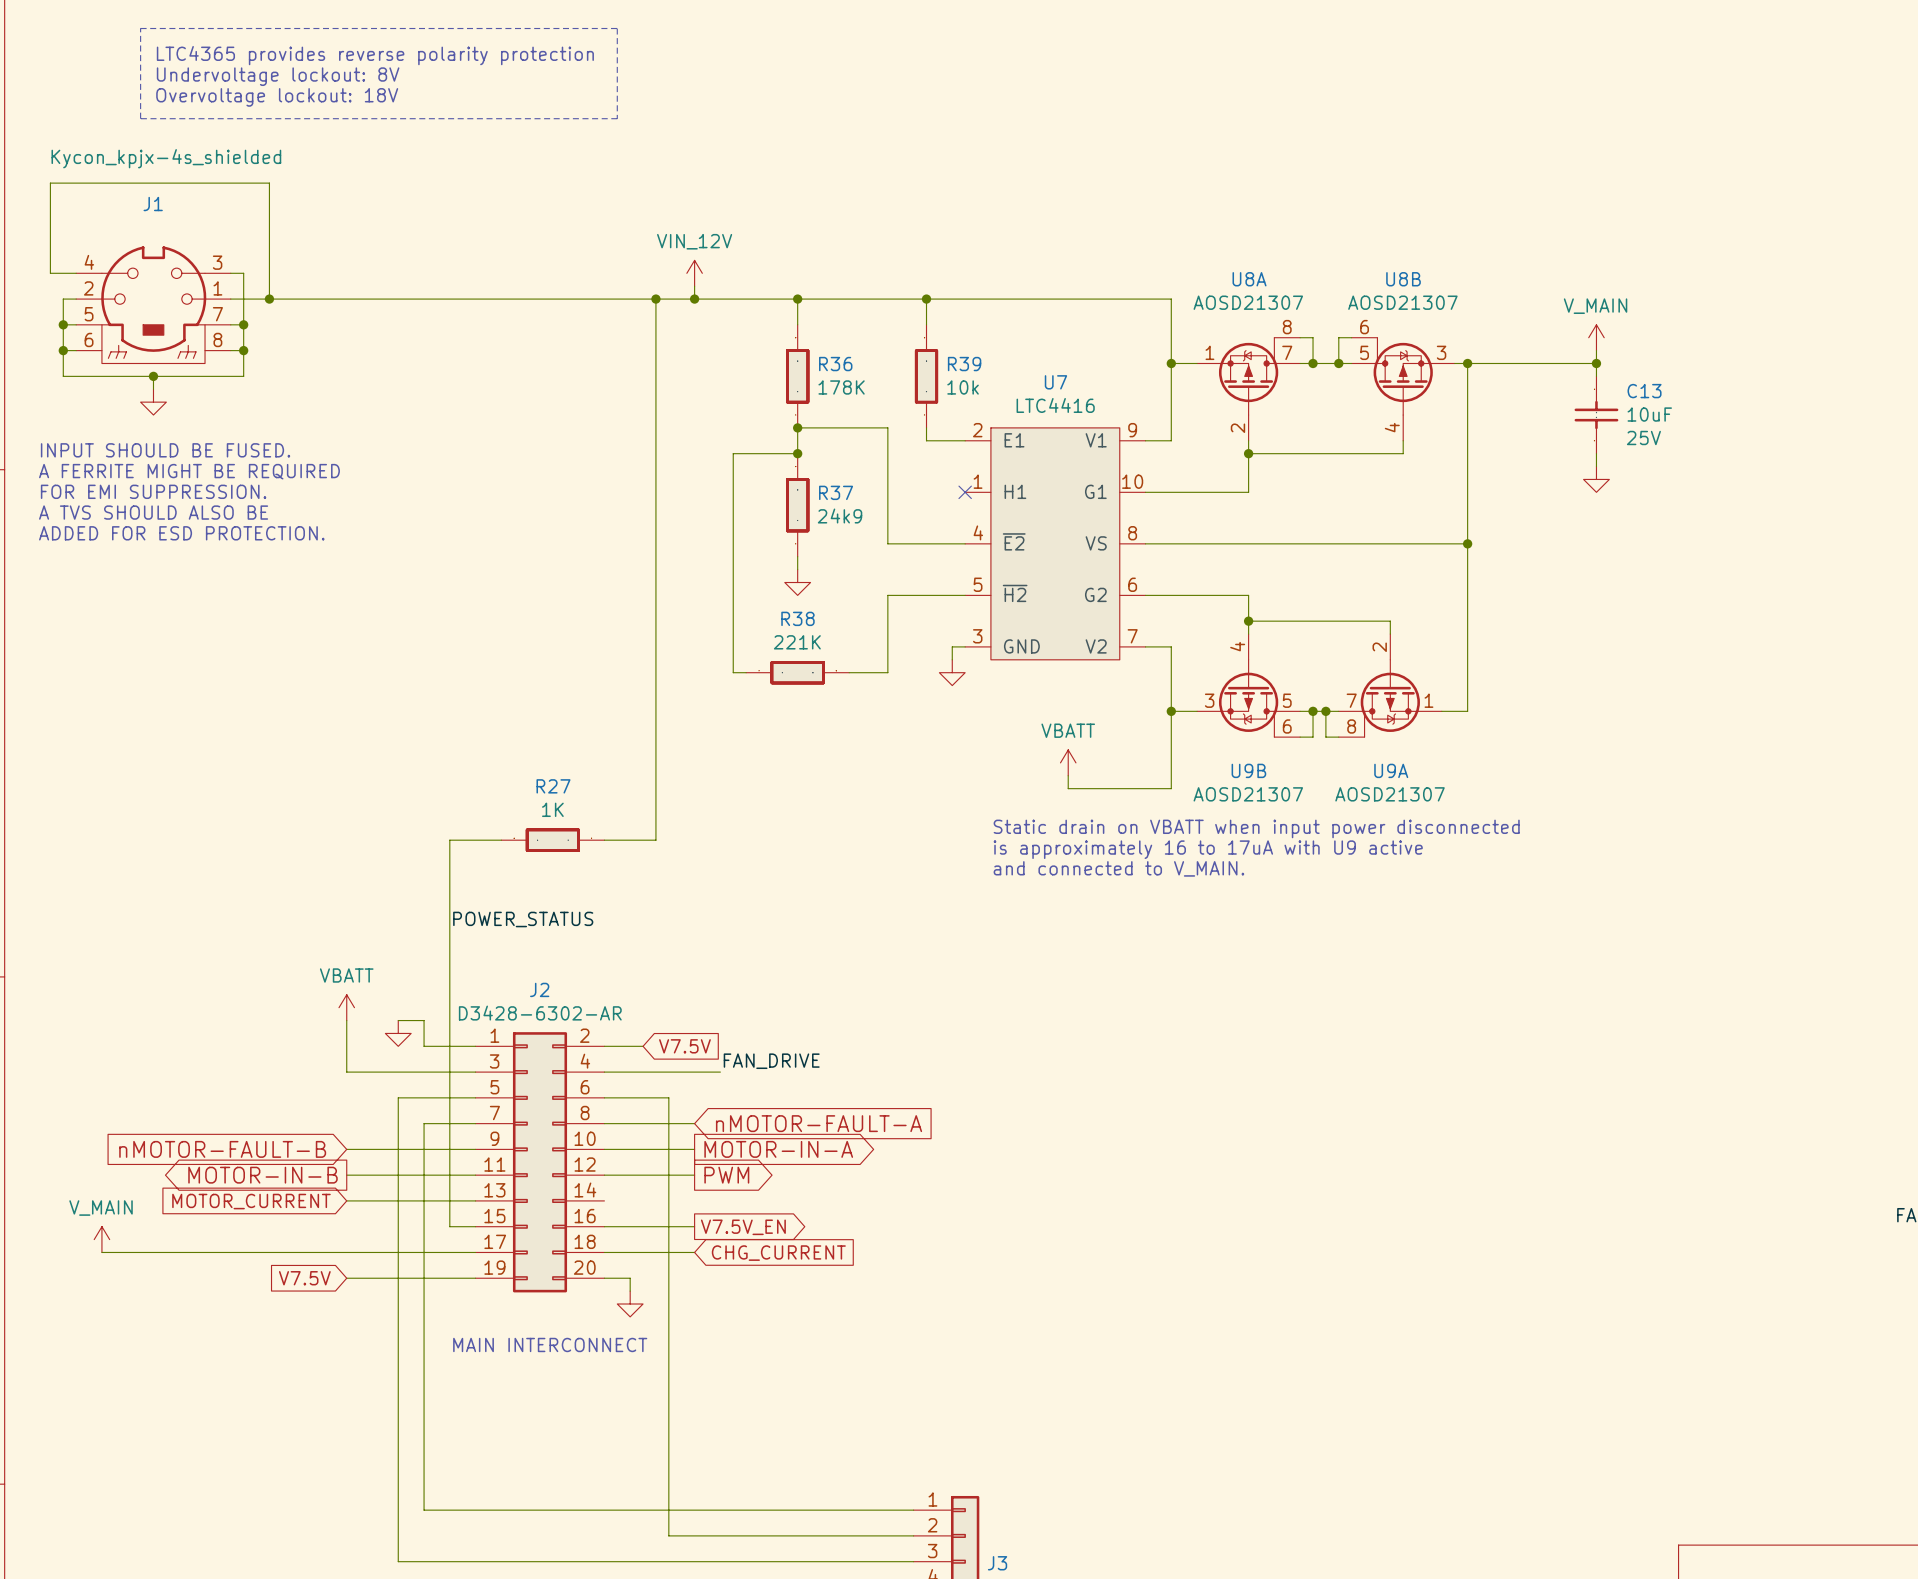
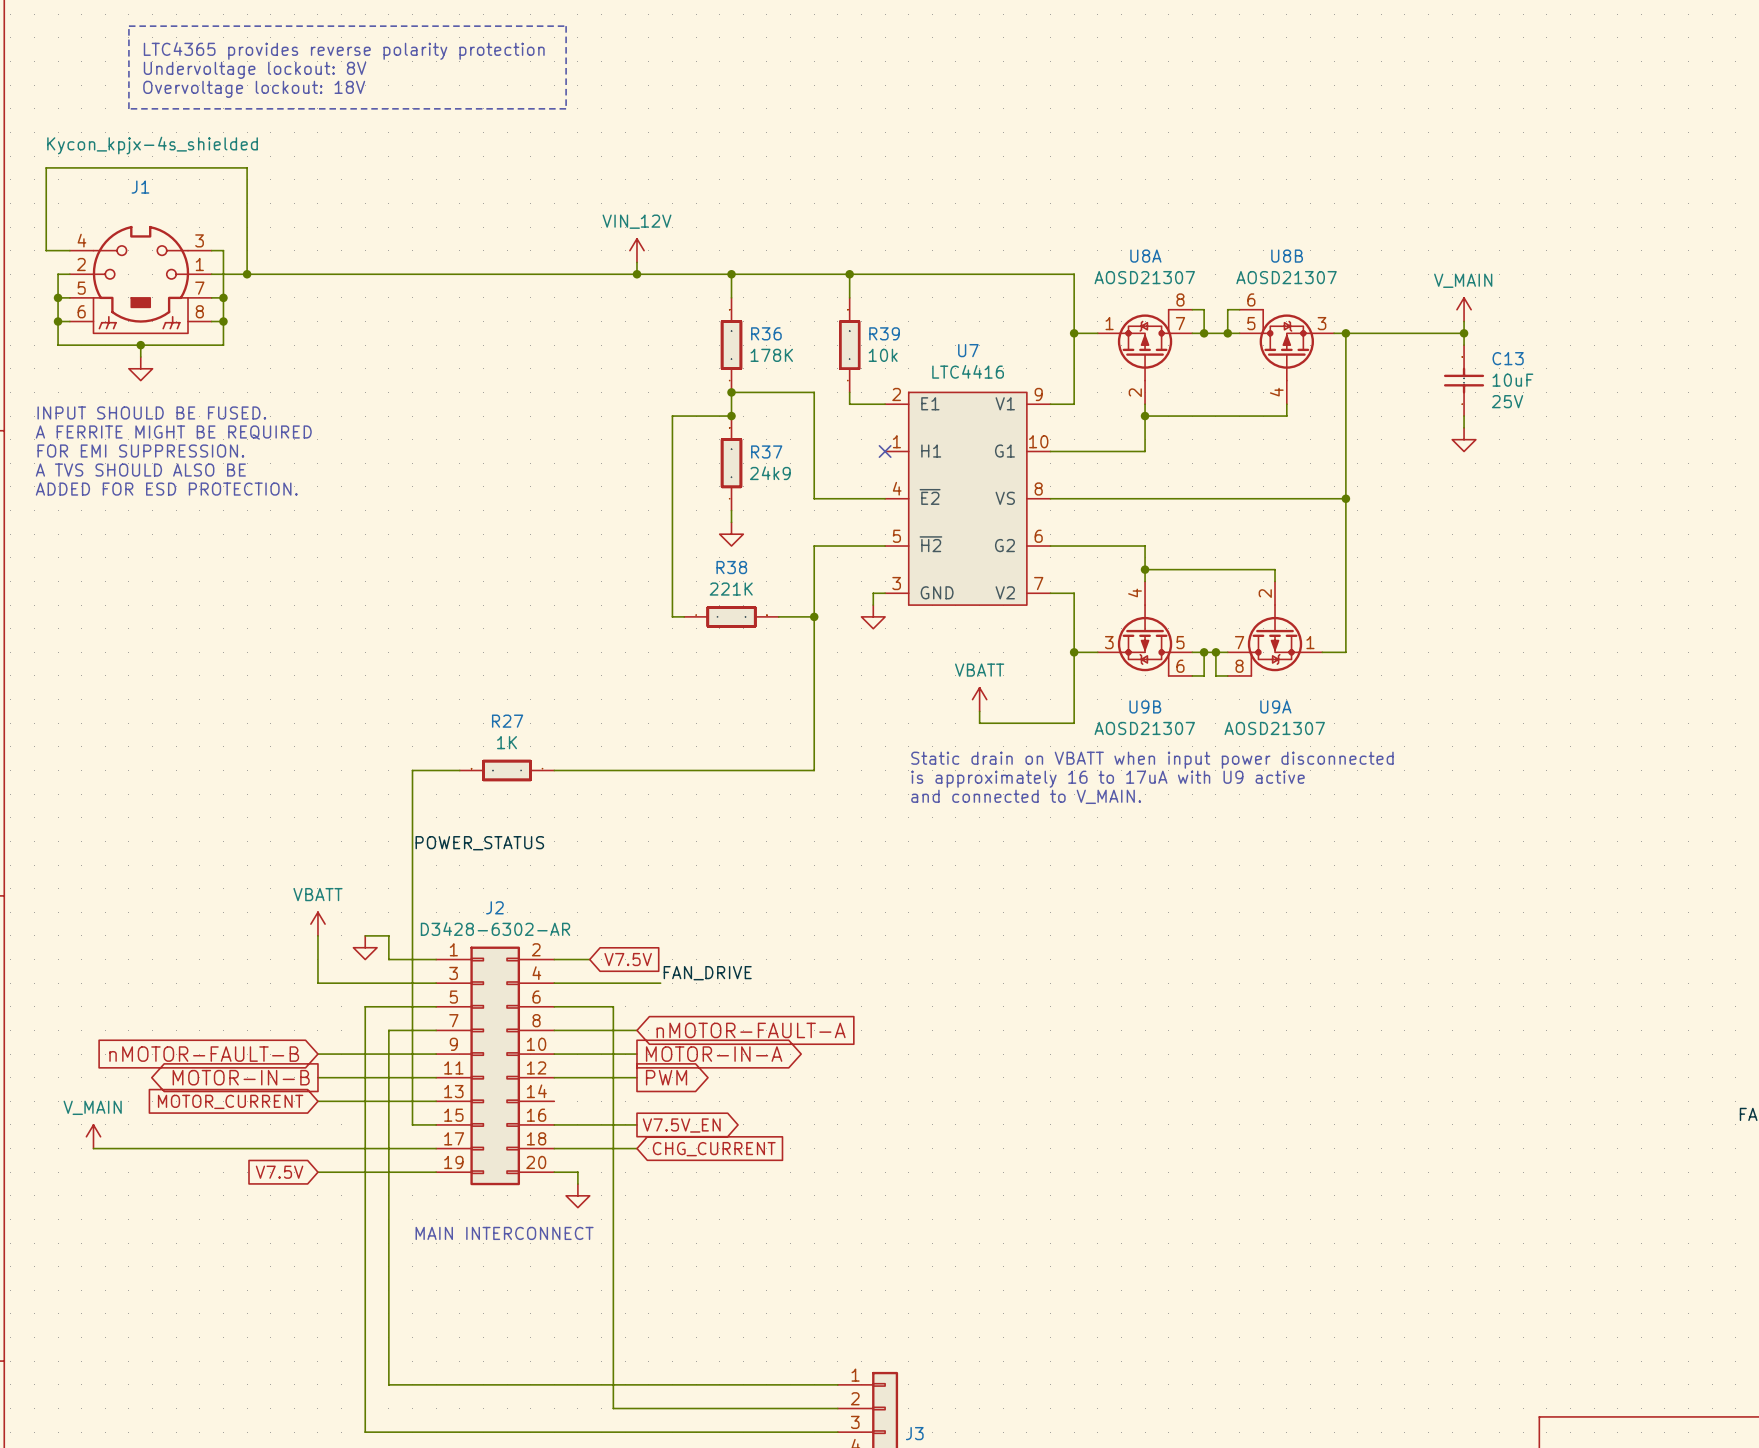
wire: (655, 299) (655, 840) -> (814, 616) (814, 770) (601, 770)
junction: (655, 299) -> none
junction: none -> (814, 616)

